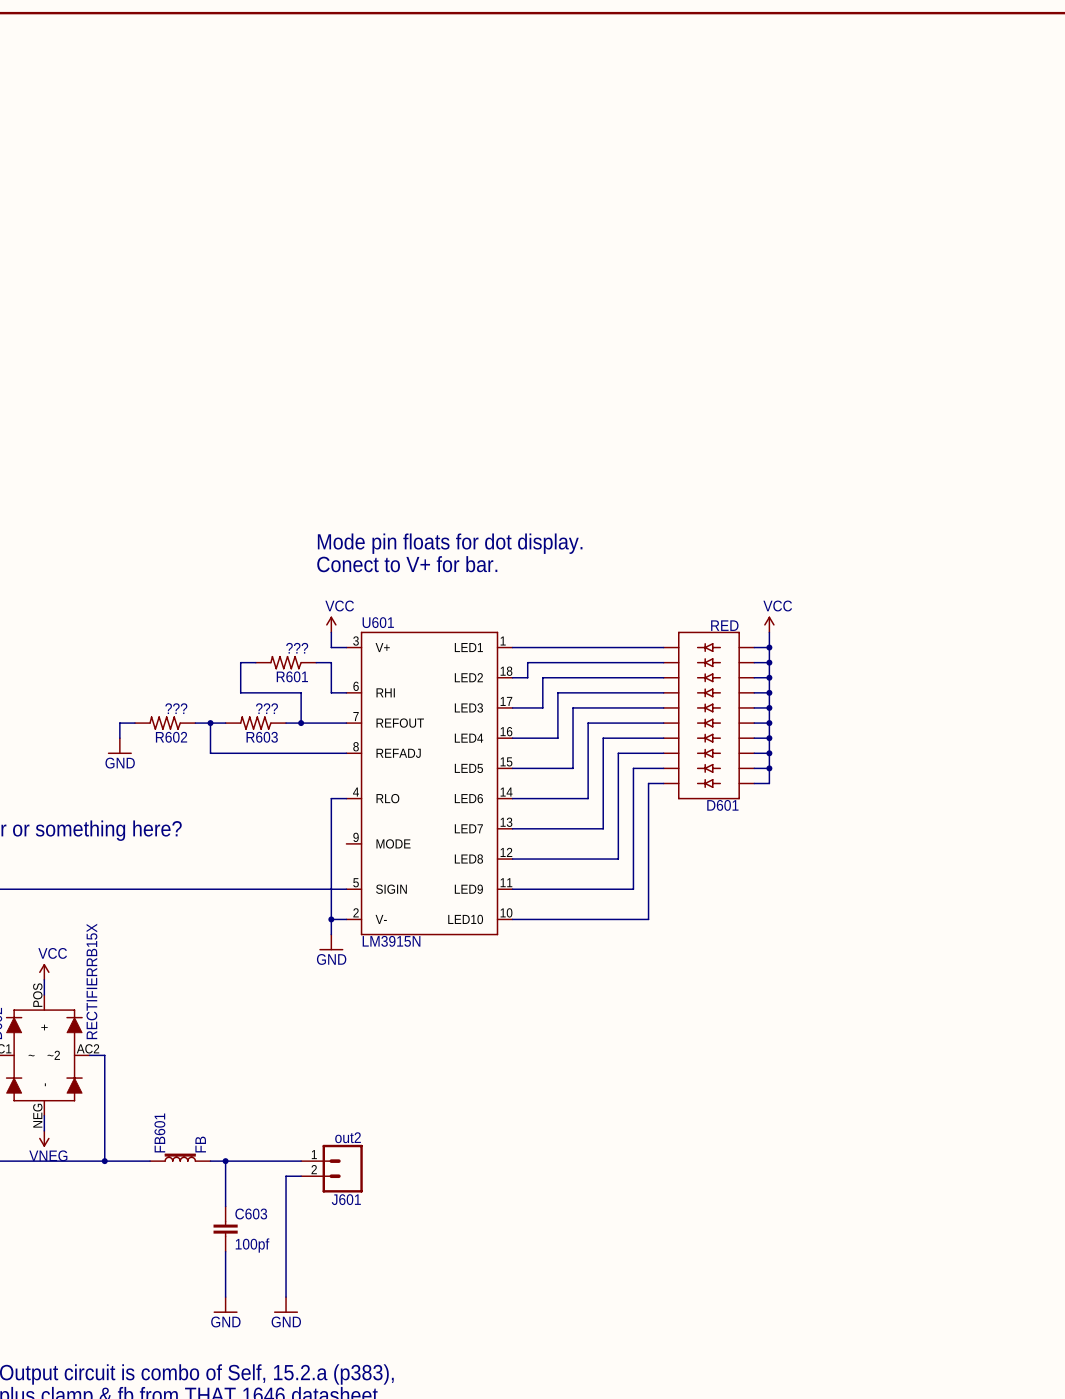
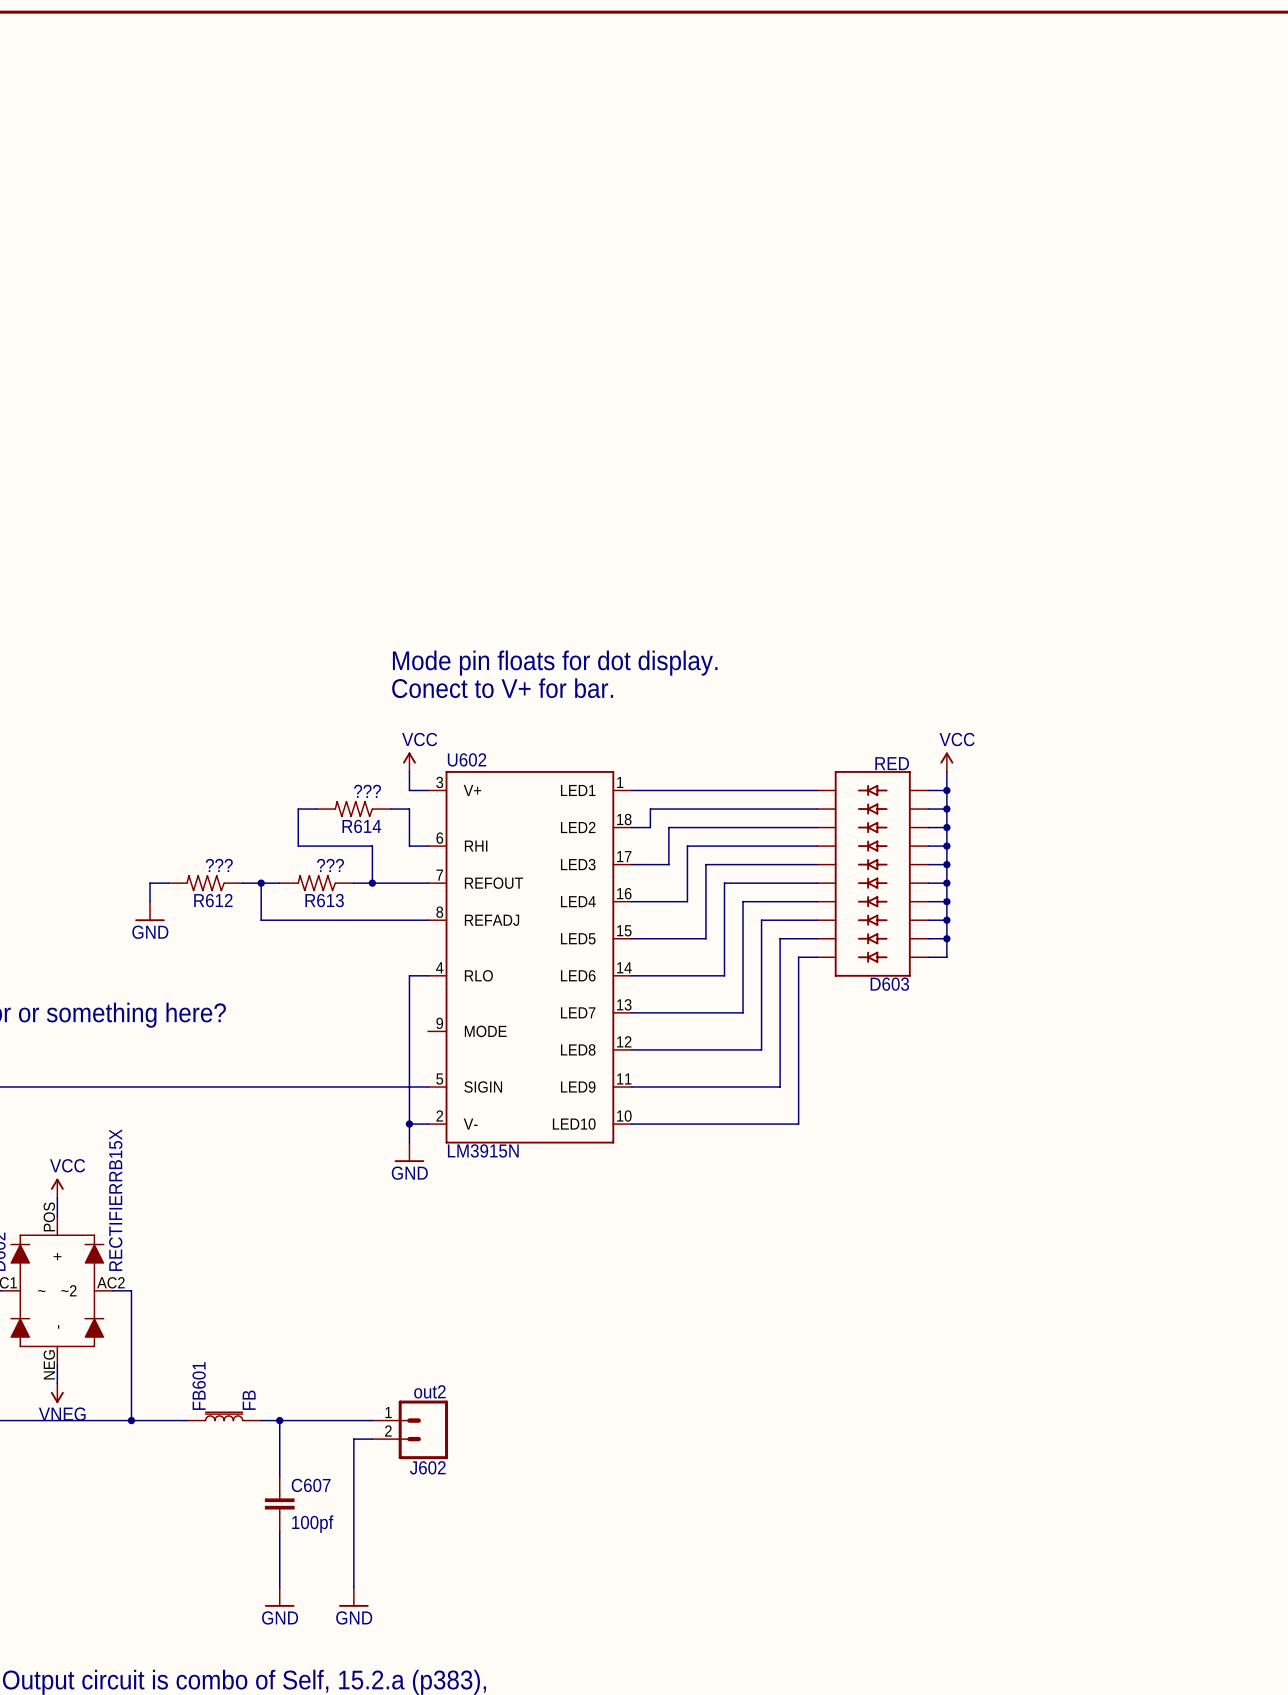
U601 name: U601 (378, 622) -> U602 (467, 759)
R601 name: R601 (292, 676) -> R614 (361, 826)
R602 name: R602 (171, 737) -> R612 (213, 900)
R603 name: R603 (262, 737) -> R613 (324, 900)
D601 name: D601 (722, 805) -> D603 (889, 984)
J601 name: J601 (346, 1199) -> J602 (427, 1467)
C603 name: C603 (251, 1213) -> C607 (311, 1485)

